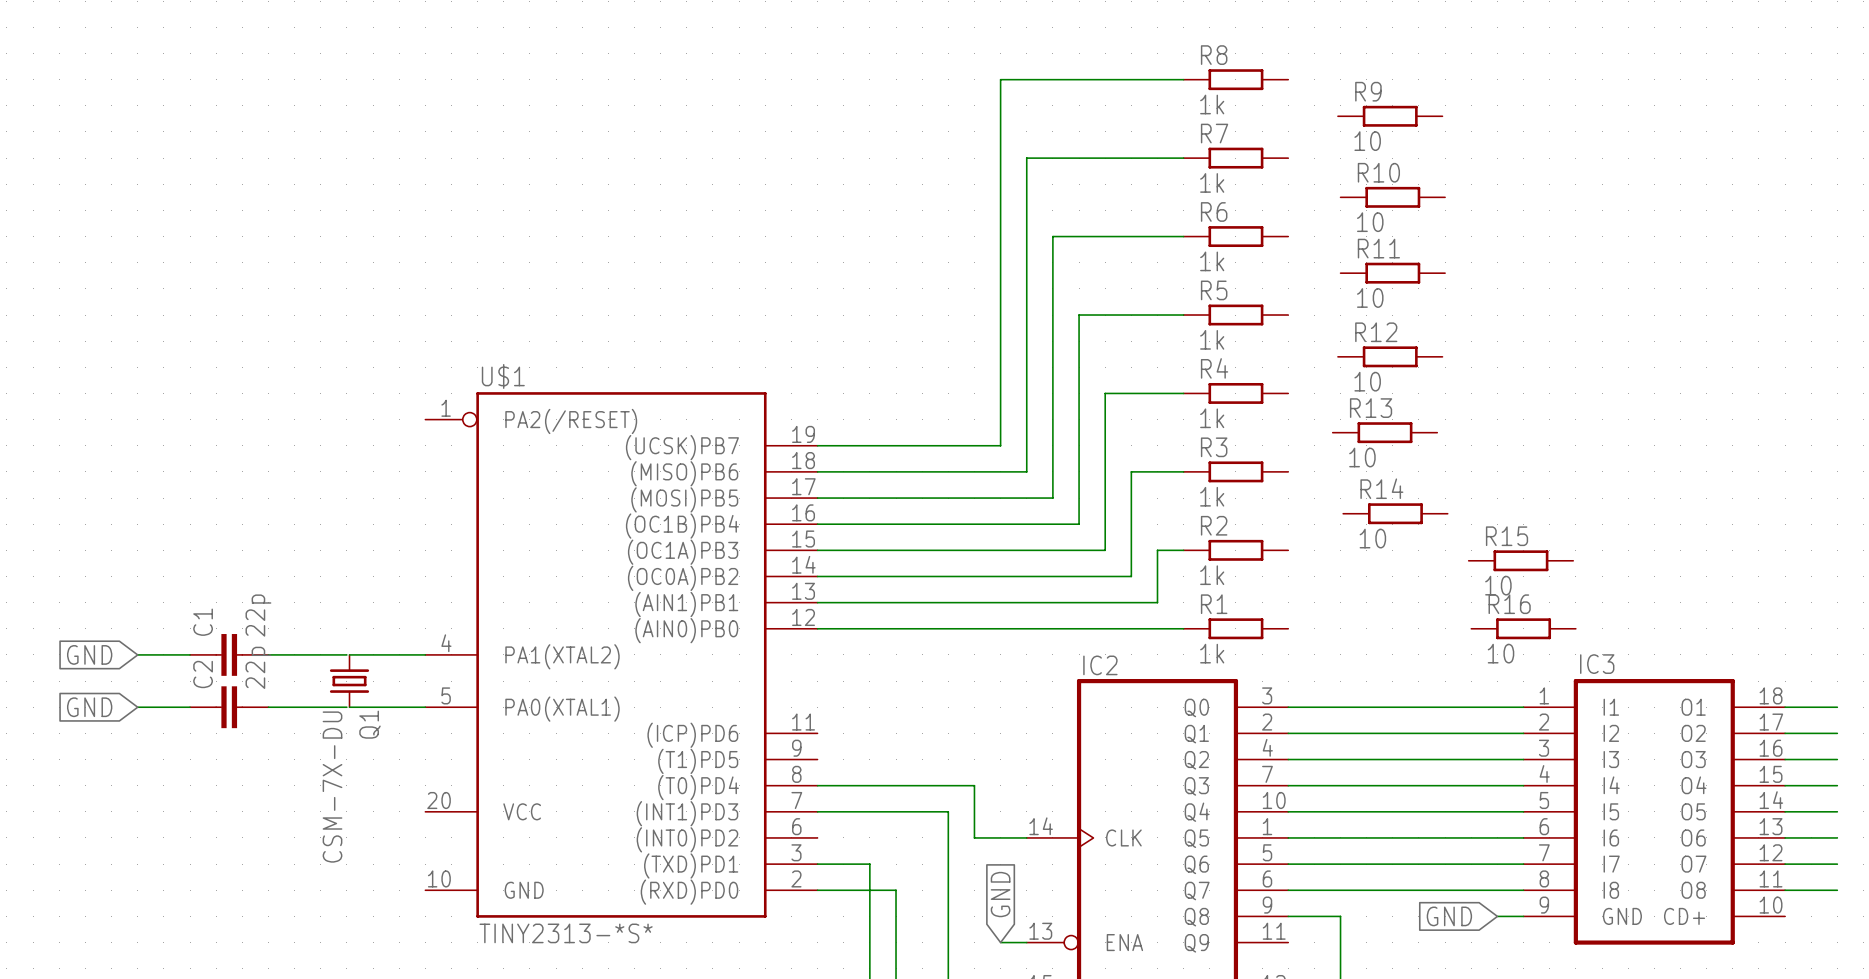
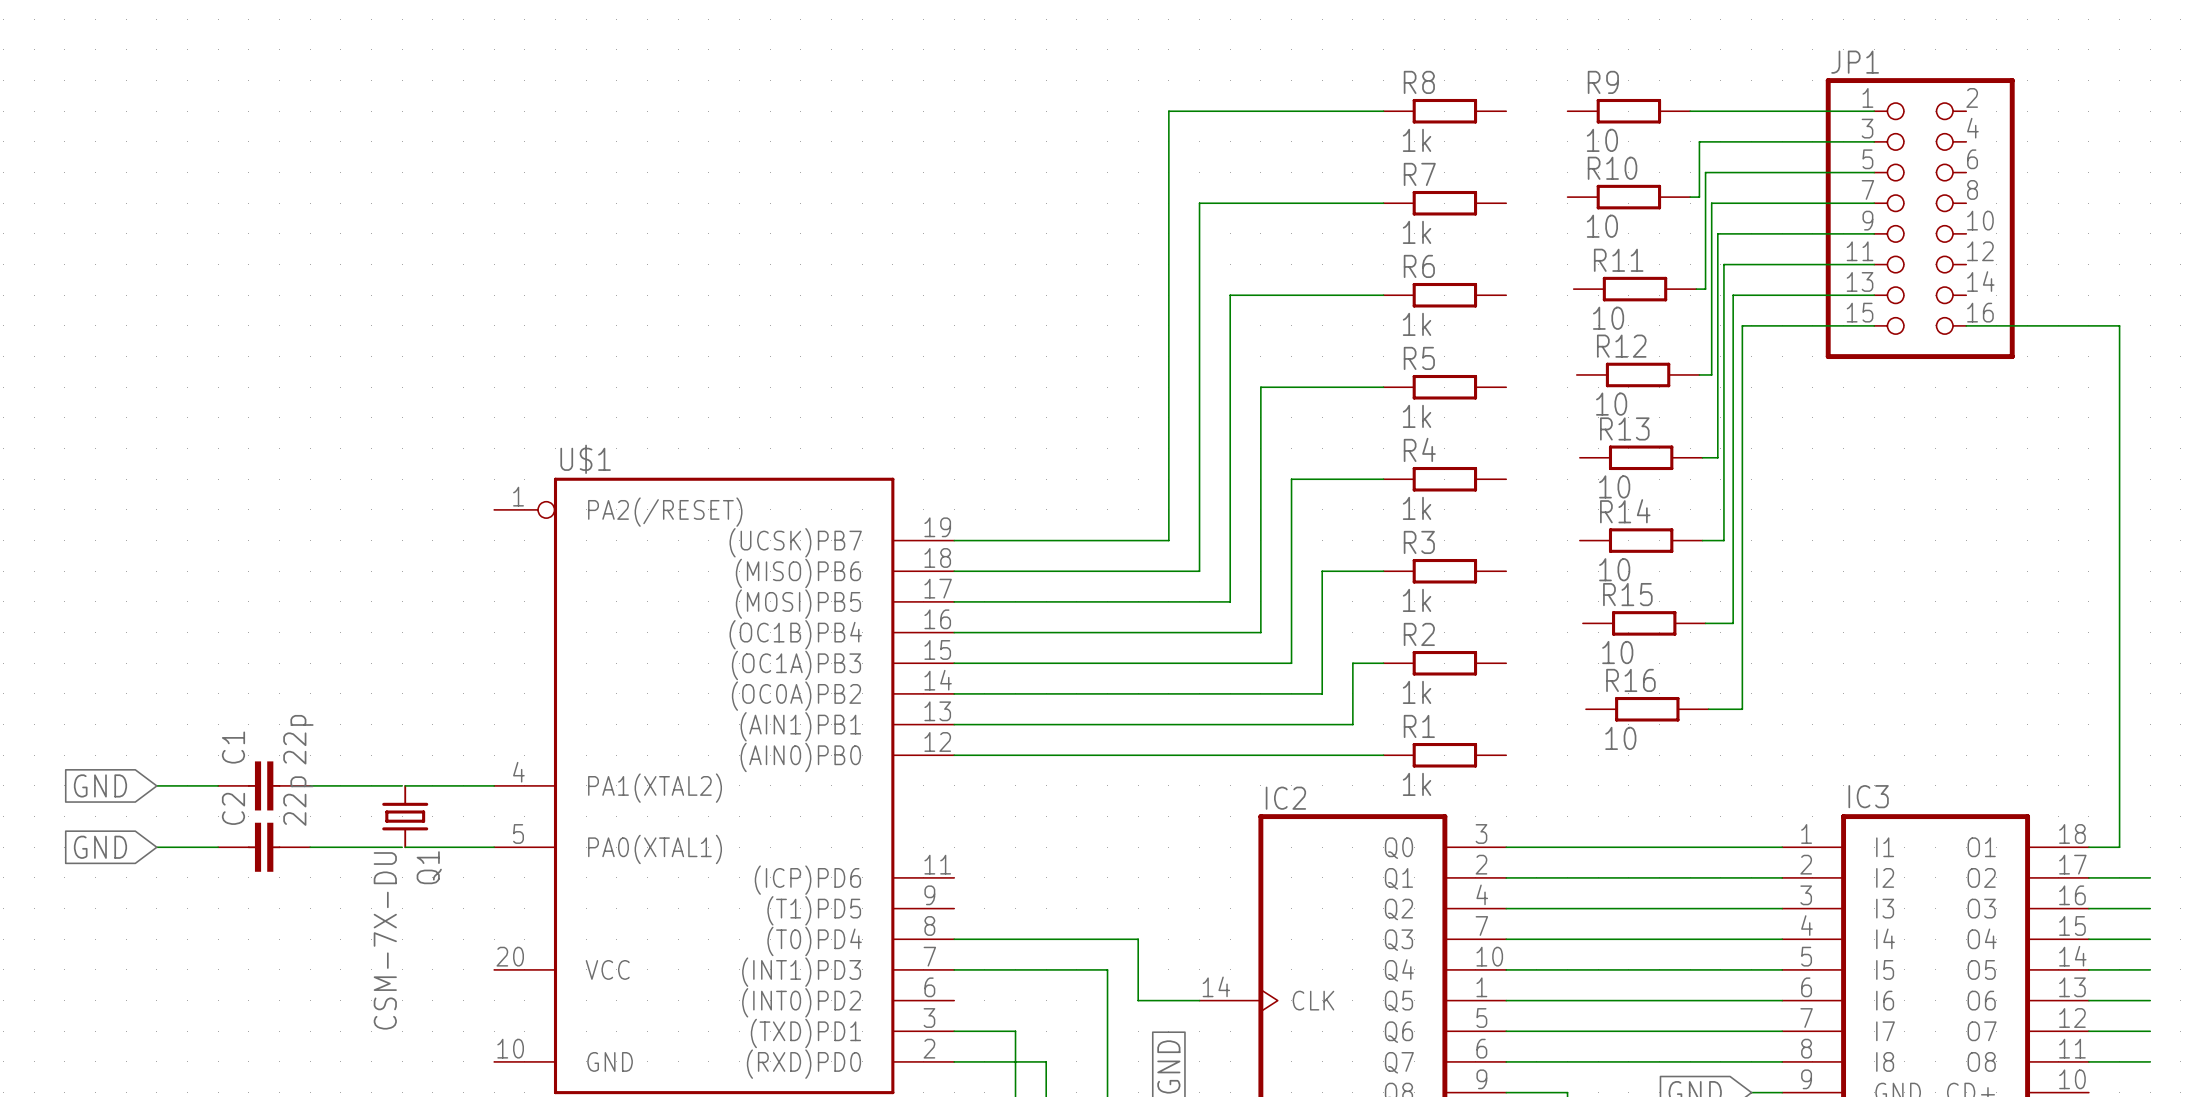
wire: none -> (1690, 111) (1874, 111)
wire: none -> (1874, 141) (1699, 141) (1699, 197) (1690, 197)
R9 position: (1390, 116) -> (1628, 111)
wire: none -> (1874, 172) (1705, 172) (1705, 289) (1696, 289)
wire: none -> (1874, 203) (1711, 203) (1711, 374) (1699, 374)
JP1: none -> (1920, 218)
wire: none -> (1874, 233) (1717, 233) (1717, 457) (1702, 457)
R10 position: (1392, 197) -> (1628, 197)
wire: none -> (1874, 264) (1723, 264) (1723, 540) (1702, 540)
wire: none -> (1874, 295) (1733, 295) (1733, 623) (1705, 623)
wire: none -> (1874, 325) (1742, 325) (1742, 709) (1708, 709)
R11 position: (1392, 273) -> (1635, 289)
R12 position: (1390, 356) -> (1638, 374)
R13 position: (1384, 432) -> (1641, 457)
R14 position: (1395, 513) -> (1641, 540)
R15 position: (1520, 560) -> (1644, 623)
R16 position: (1523, 628) -> (1647, 709)
wire: (1811, 707) (1837, 707) -> (2119, 847) (2119, 325) (1966, 325)

